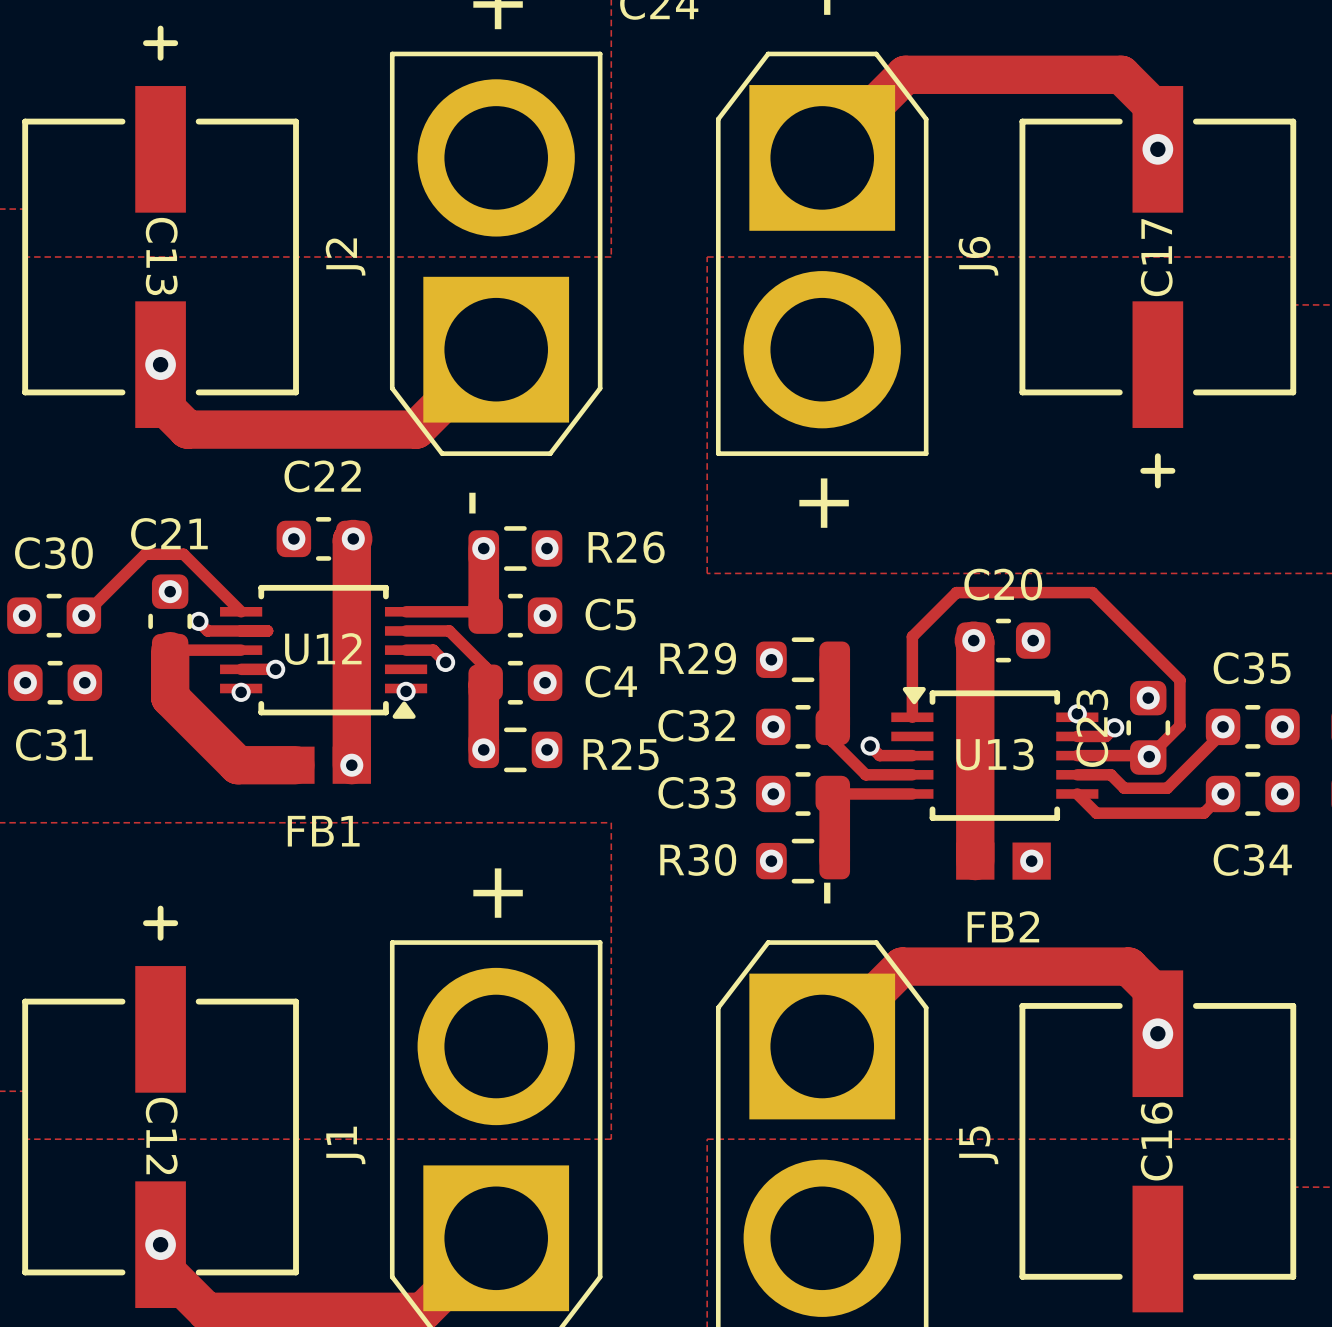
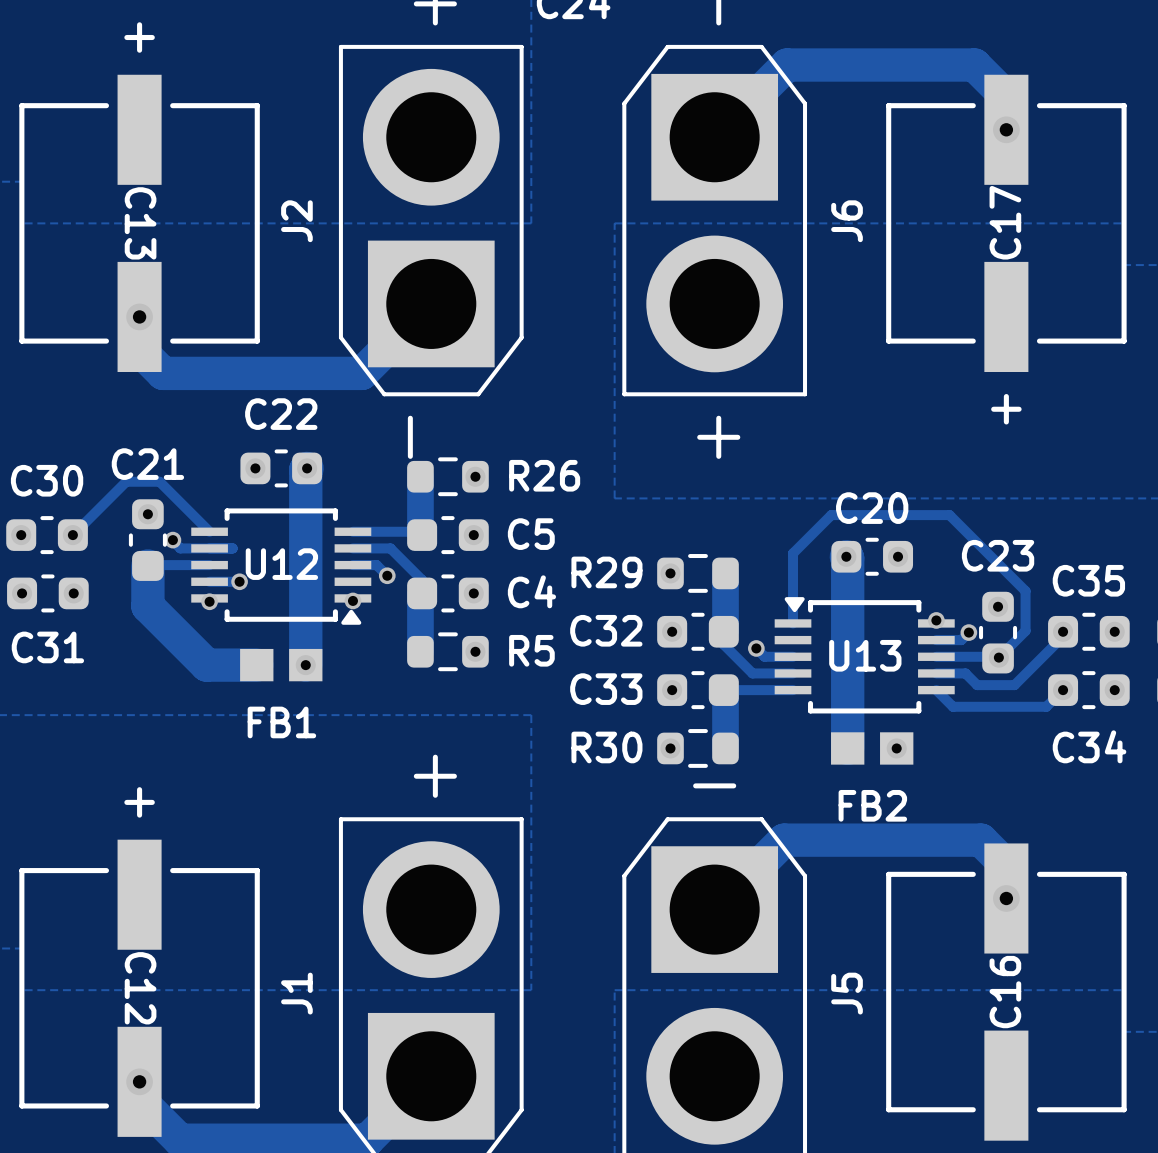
via: (483, 548) -> none
C23 name rotation: 0° (1092, 728) -> 90° clockwise (998, 555)
via: (483, 749) -> none
R25 name: R25 (621, 754) -> R5 (531, 650)
J5 text rotation: 0° (827, 893) -> 90° clockwise (714, 785)

